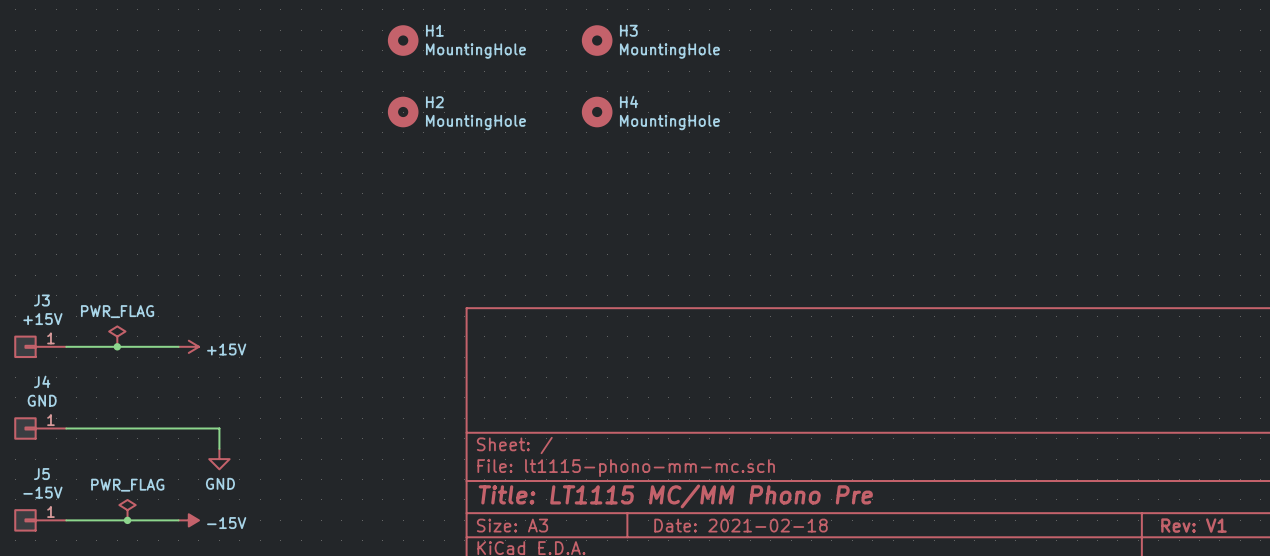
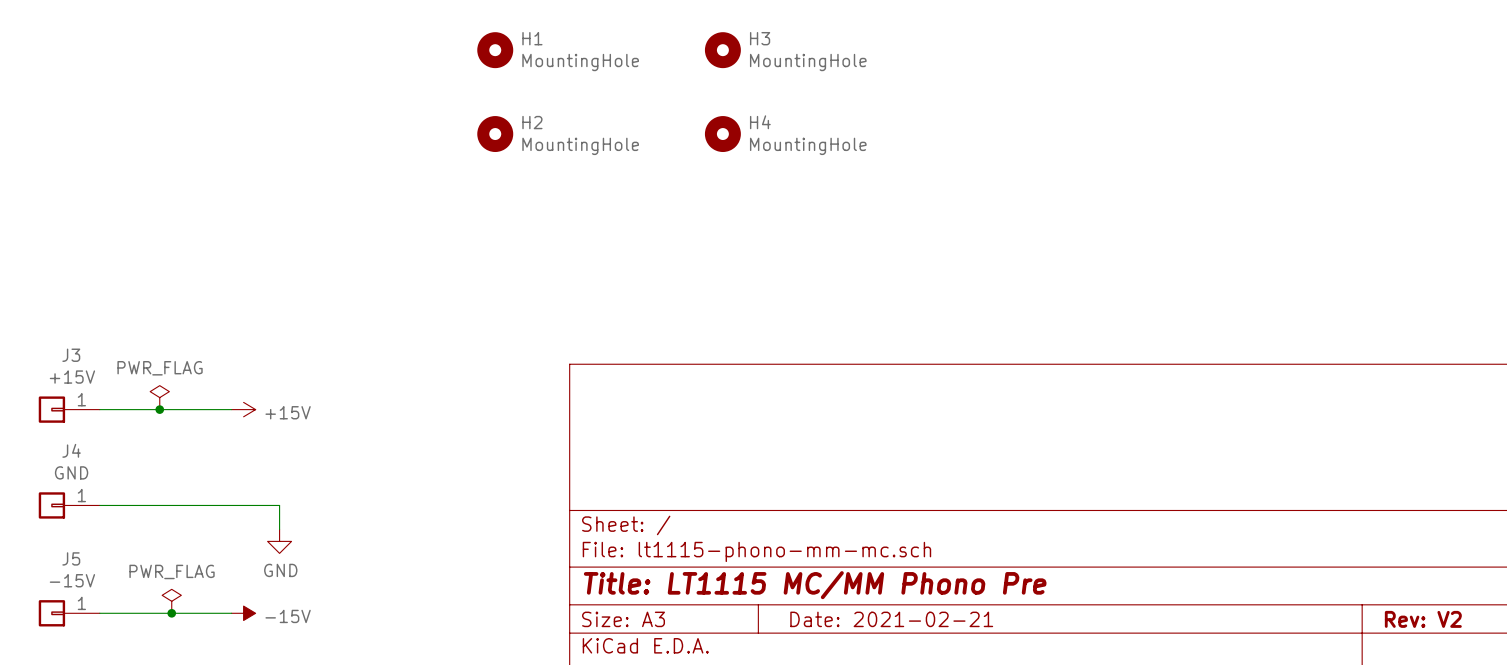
title block: Date: 2021-02-18 (741, 525) -> Date: 2021-02-21 (891, 619)
title block: Rev: V1 (1193, 525) -> Rev: V2 (1423, 619)

